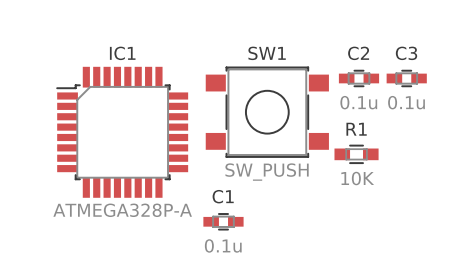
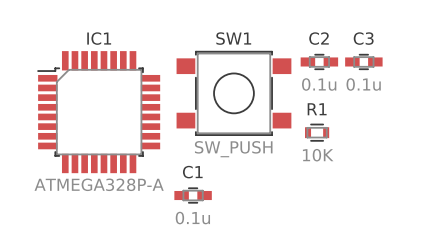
R1 footprint: [334, 144, 379, 165] -> [305, 123, 330, 142]

